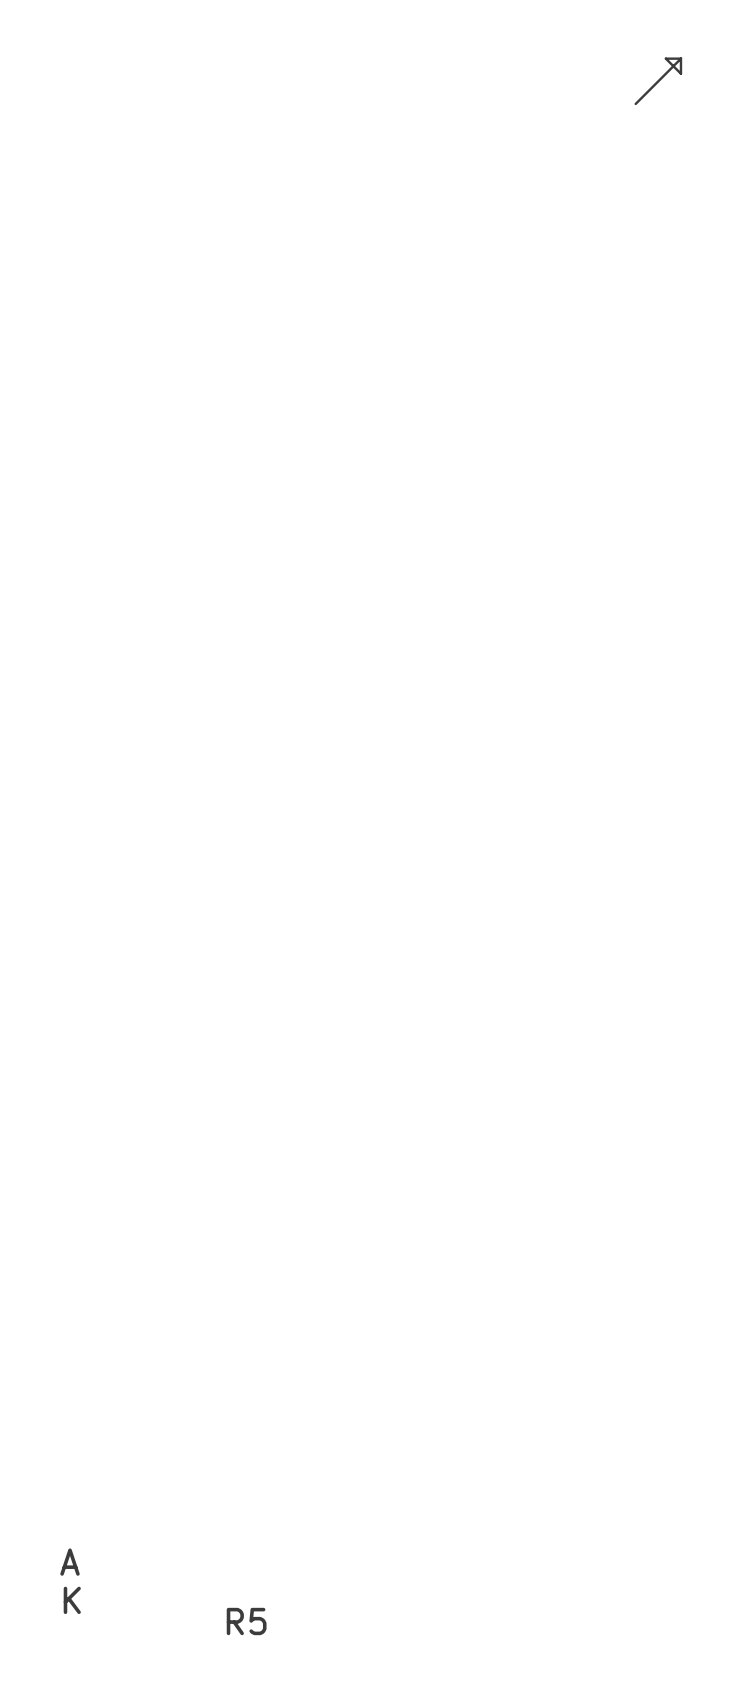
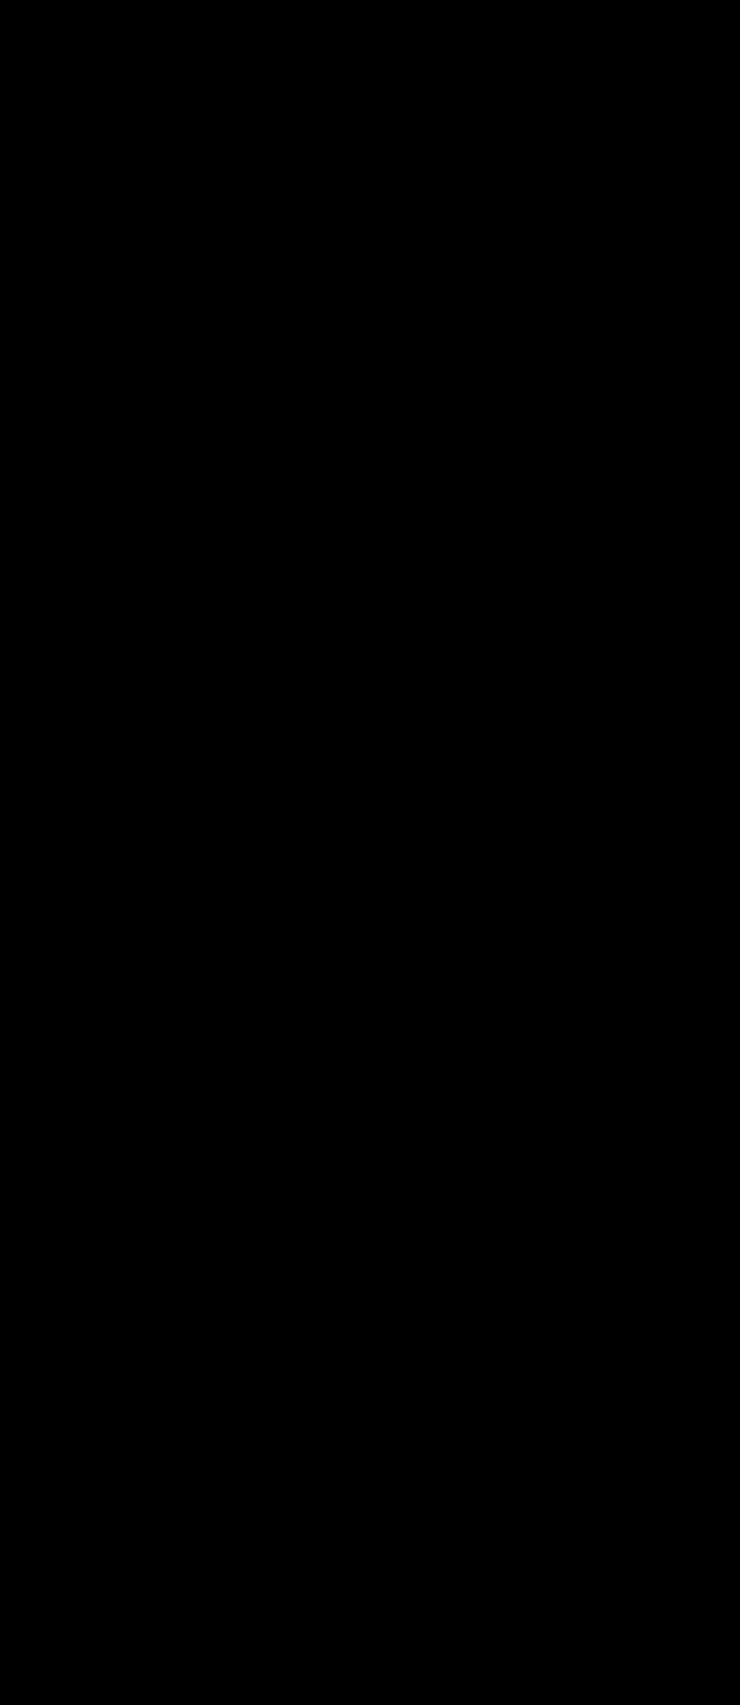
line: (680, 58) (665, 58) (680, 73) (680, 58) -> none
line: (680, 58) (635, 103) -> none
text: A (70, 1562) -> none
text: K (72, 1600) -> none
text: R5 (246, 1621) -> none

